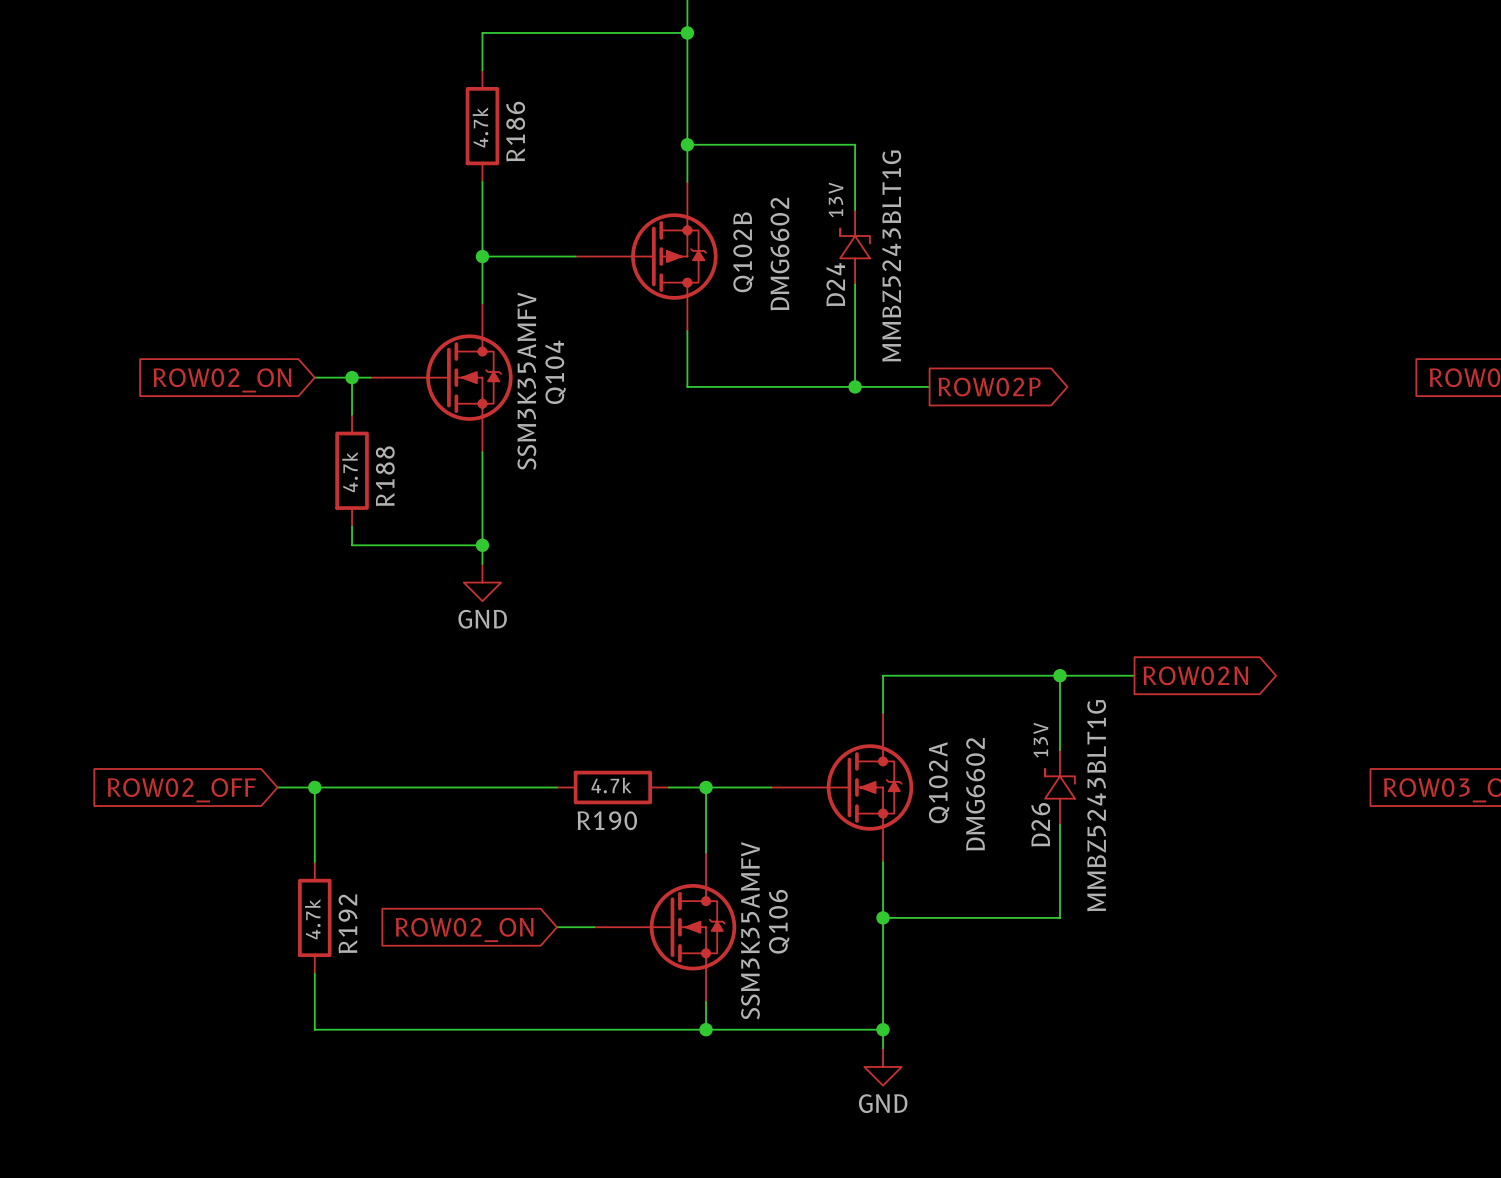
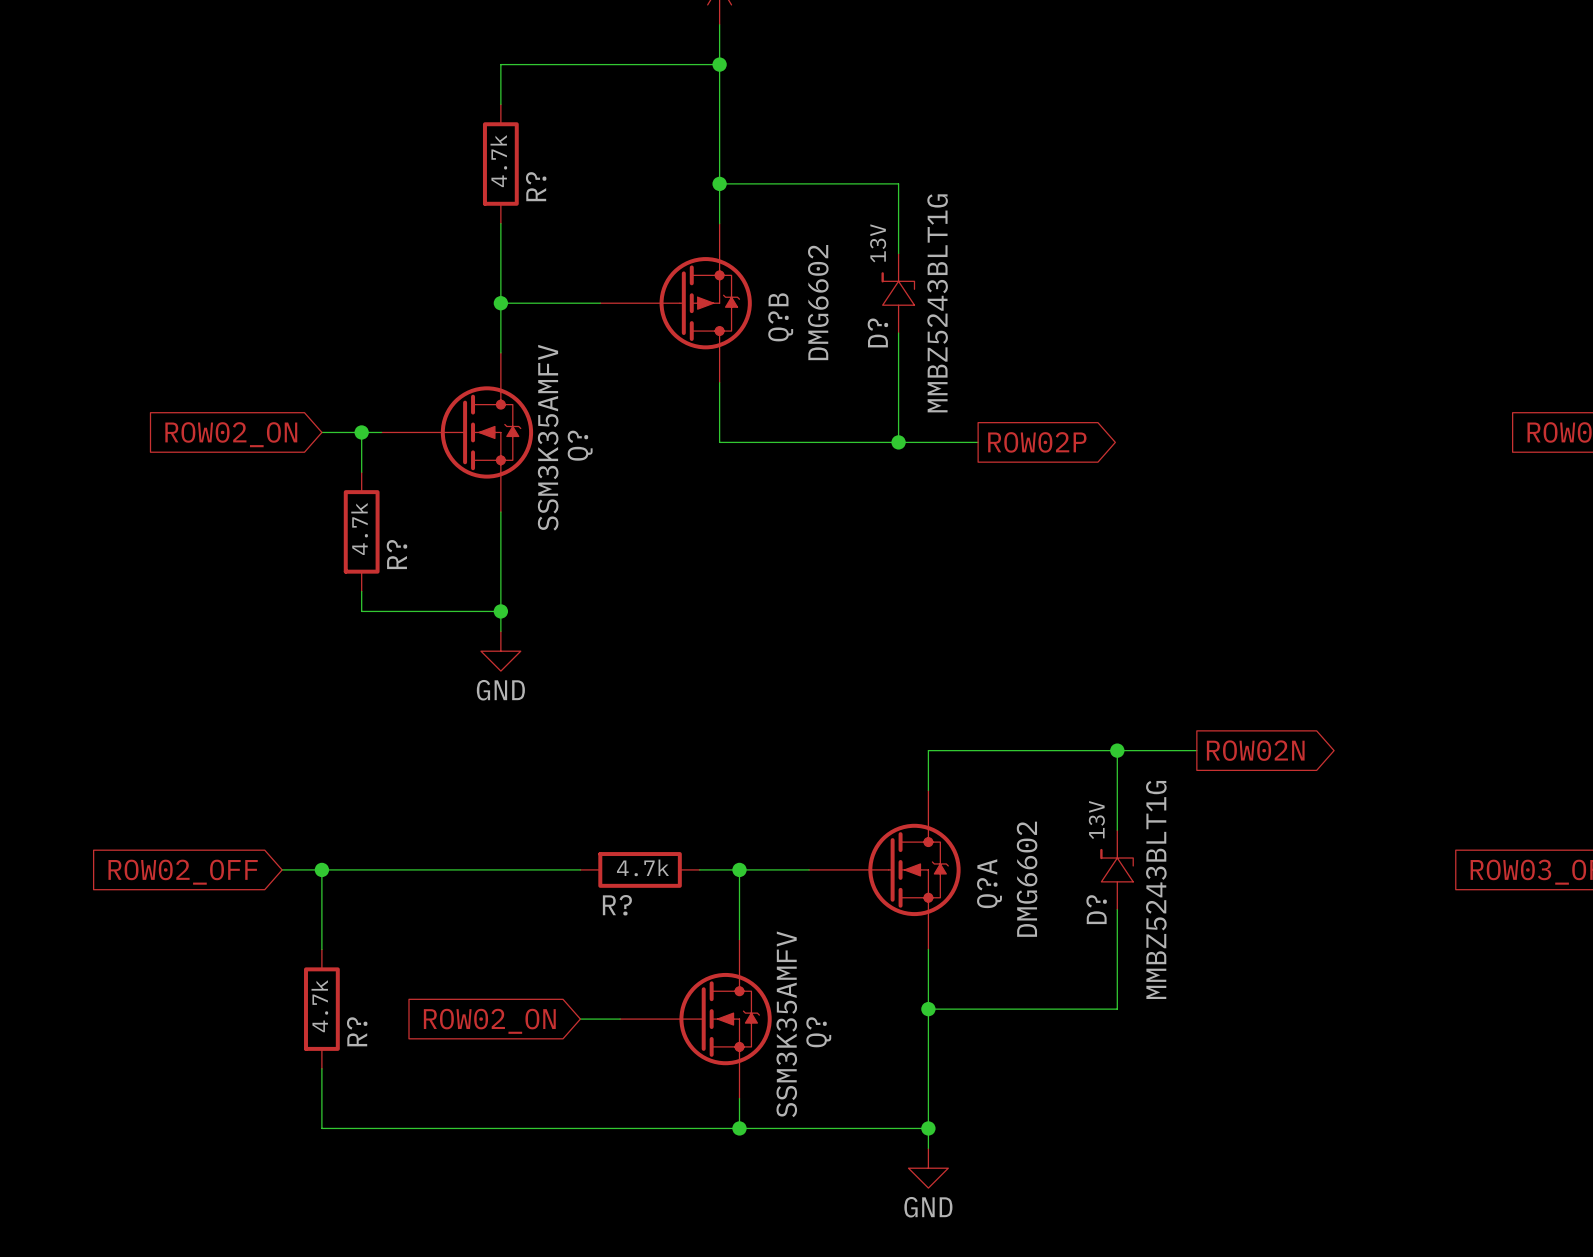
R186 name: R186 (515, 131) -> R? (536, 186)
Q102B name: Q102B (743, 252) -> Q?B (780, 317)
D24 name: D24 (835, 284) -> D? (877, 332)
Q104 name: Q104 (555, 372) -> Q? (580, 445)
R188 name: R188 (385, 476) -> R? (396, 554)
Q102A name: Q102A (939, 782) -> Q?A (989, 883)
R190 name: R190 (607, 820) -> R? (617, 905)
D26 name: D26 (1040, 824) -> D? (1096, 909)
Q106 name: Q106 (779, 921) -> Q? (818, 1032)
R192 name: R192 (348, 923) -> R? (357, 1031)

